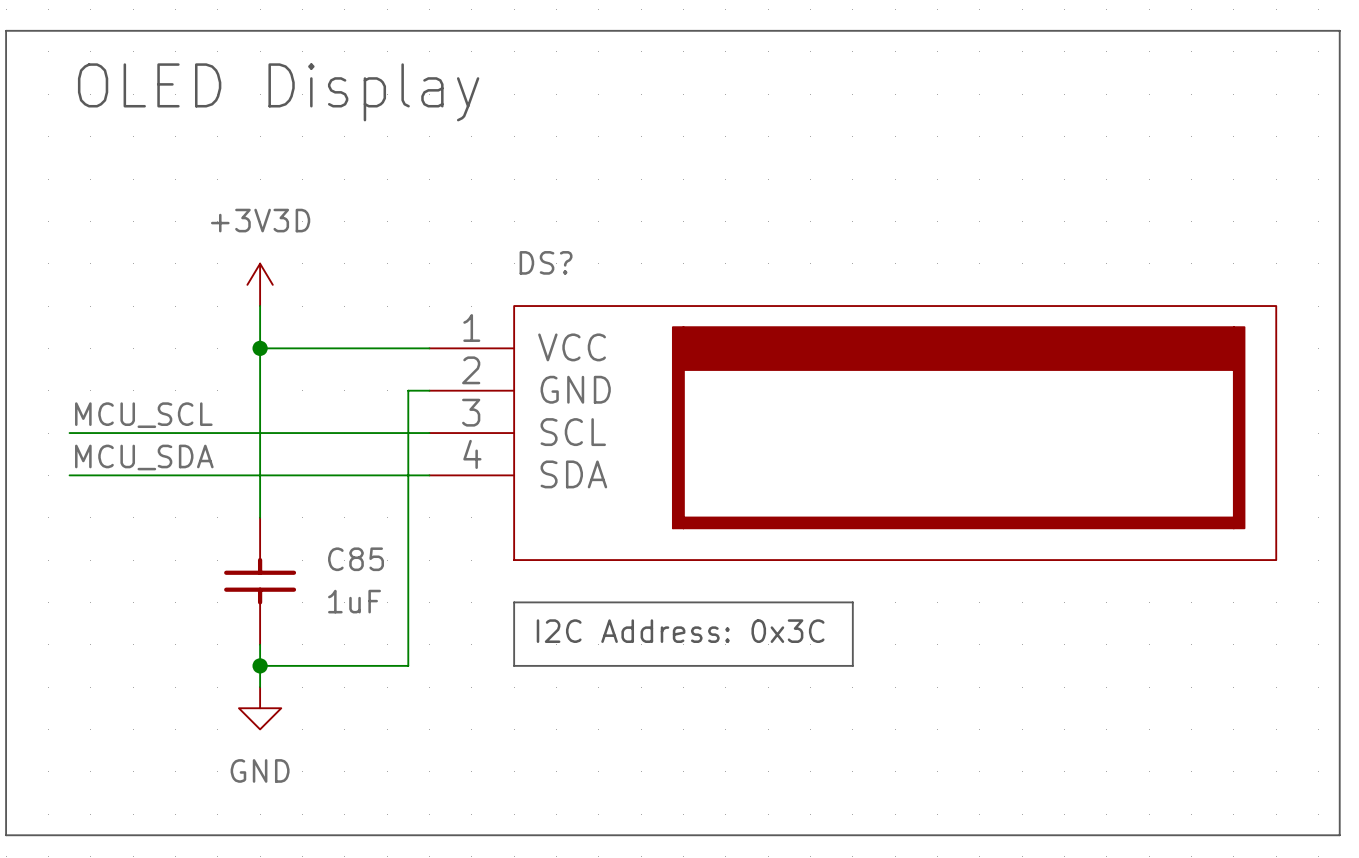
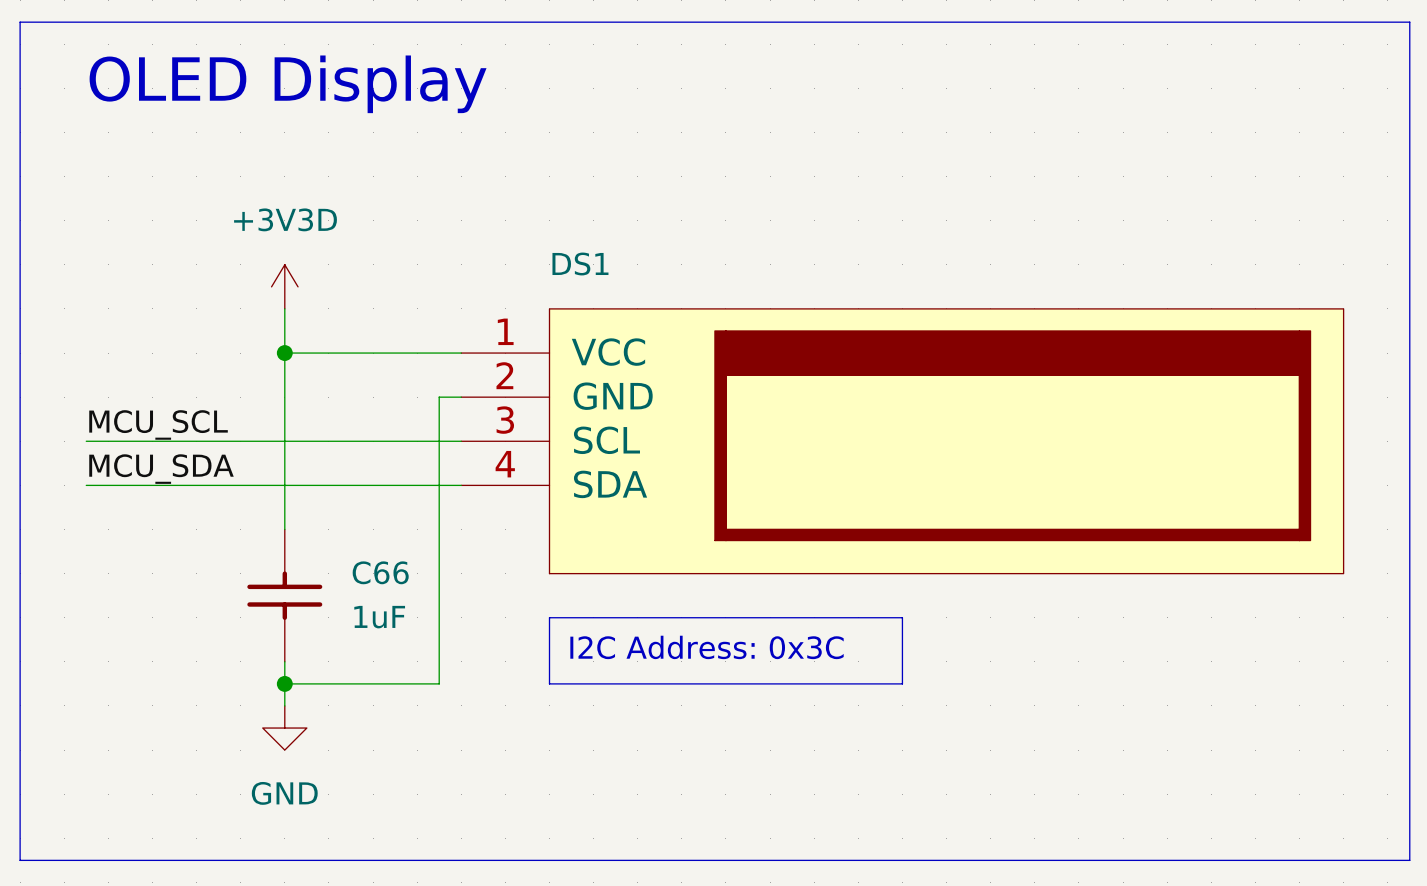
DS? name: DS? (546, 262) -> DS1 (580, 263)
C85 name: C85 (356, 559) -> C66 (380, 572)

